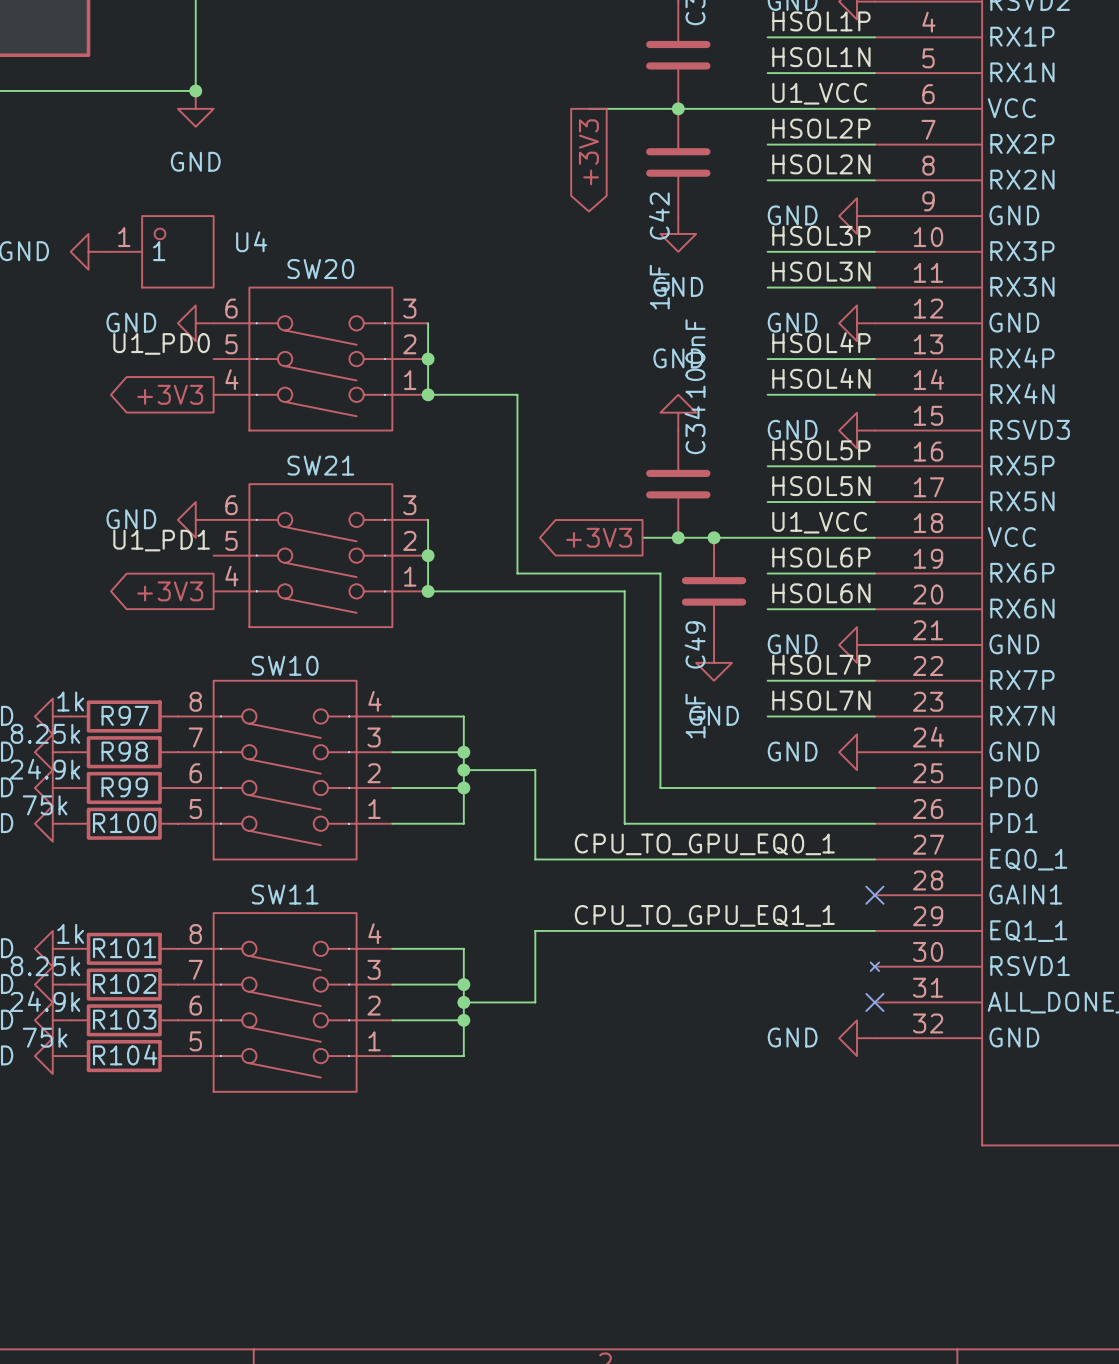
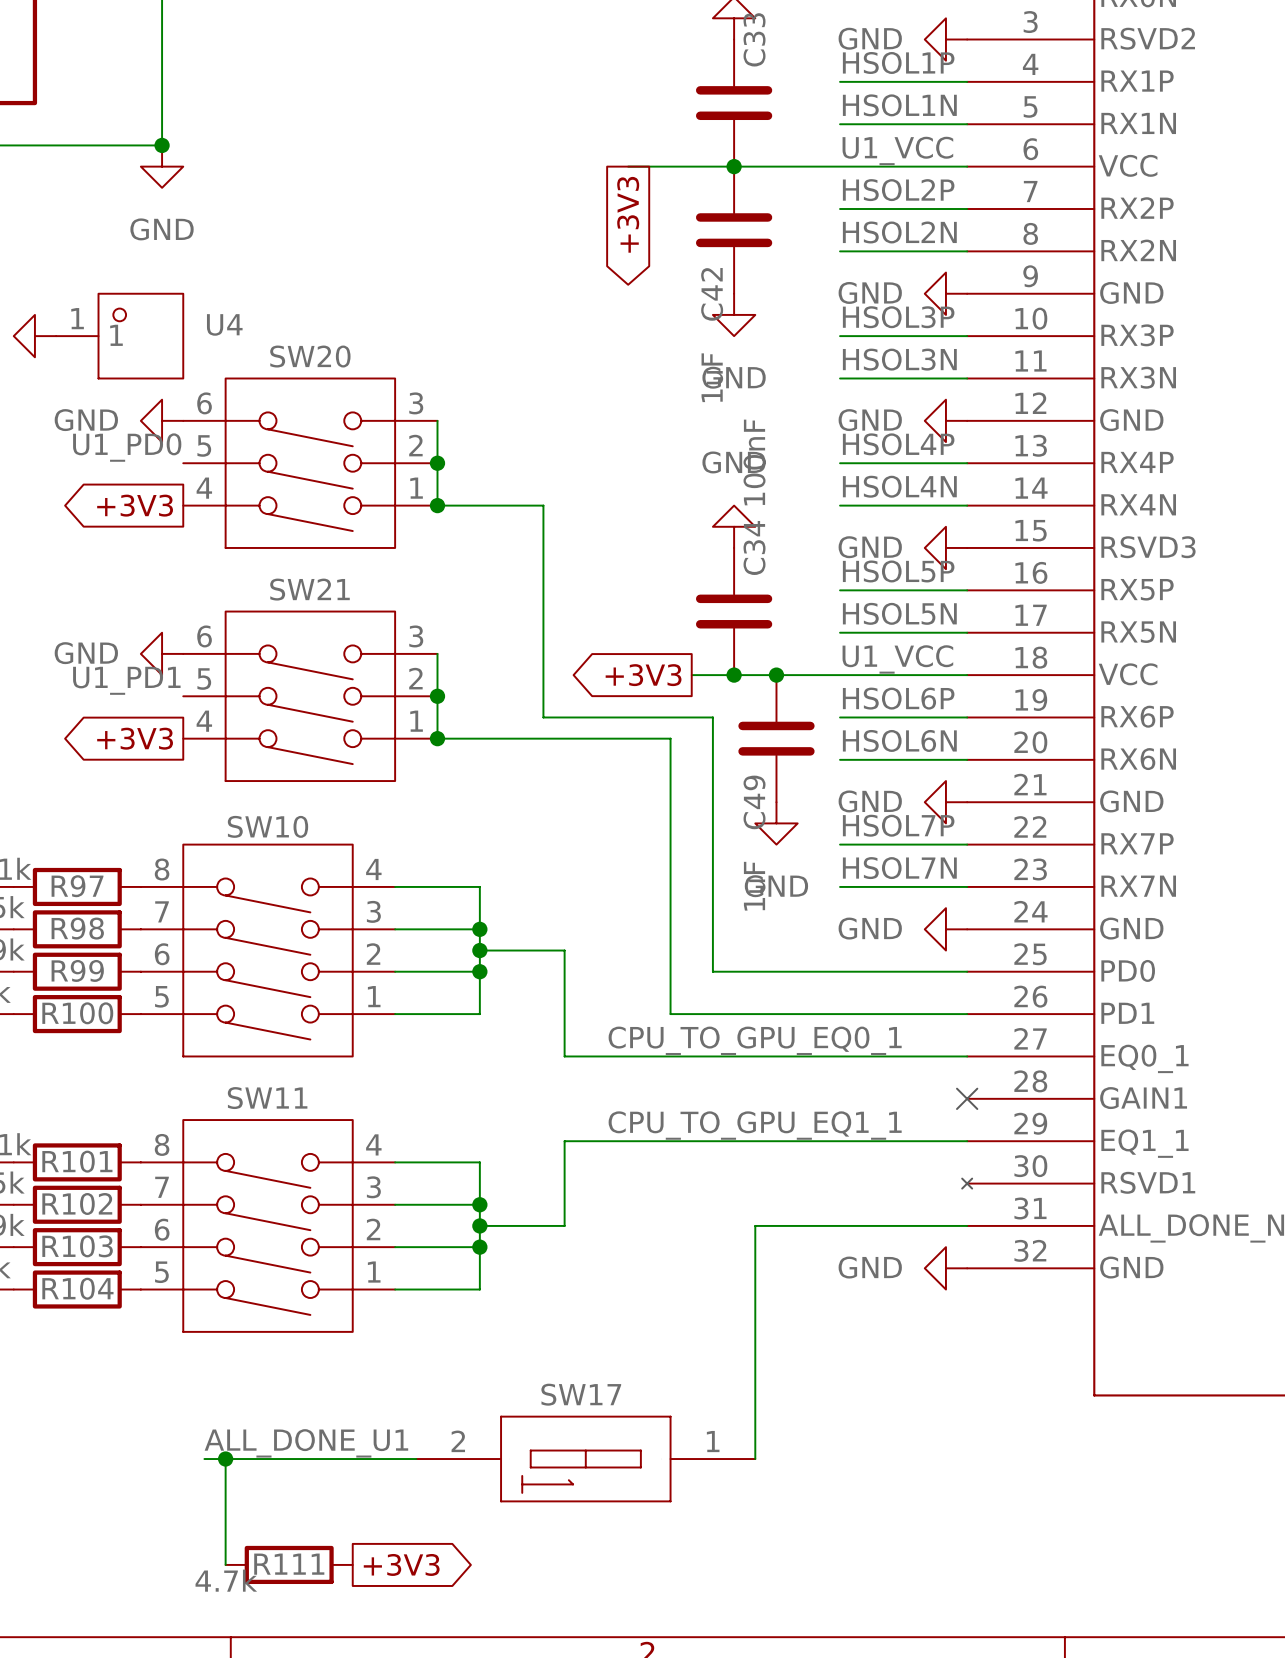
wire: none -> (967, 1225) (755, 1225) (755, 1459)
no-connect mark: (874, 1002) -> none
label: none -> ALL_DONE_U1 (306, 1443)
wire: none -> (204, 1459) (416, 1459)
wire: none -> (225, 1459) (225, 1564)
junction: none -> (225, 1459)
SW17: none -> (585, 1459)
R111: none -> 4.7k (289, 1564)
global label: none -> +3V3 (401, 1564)

